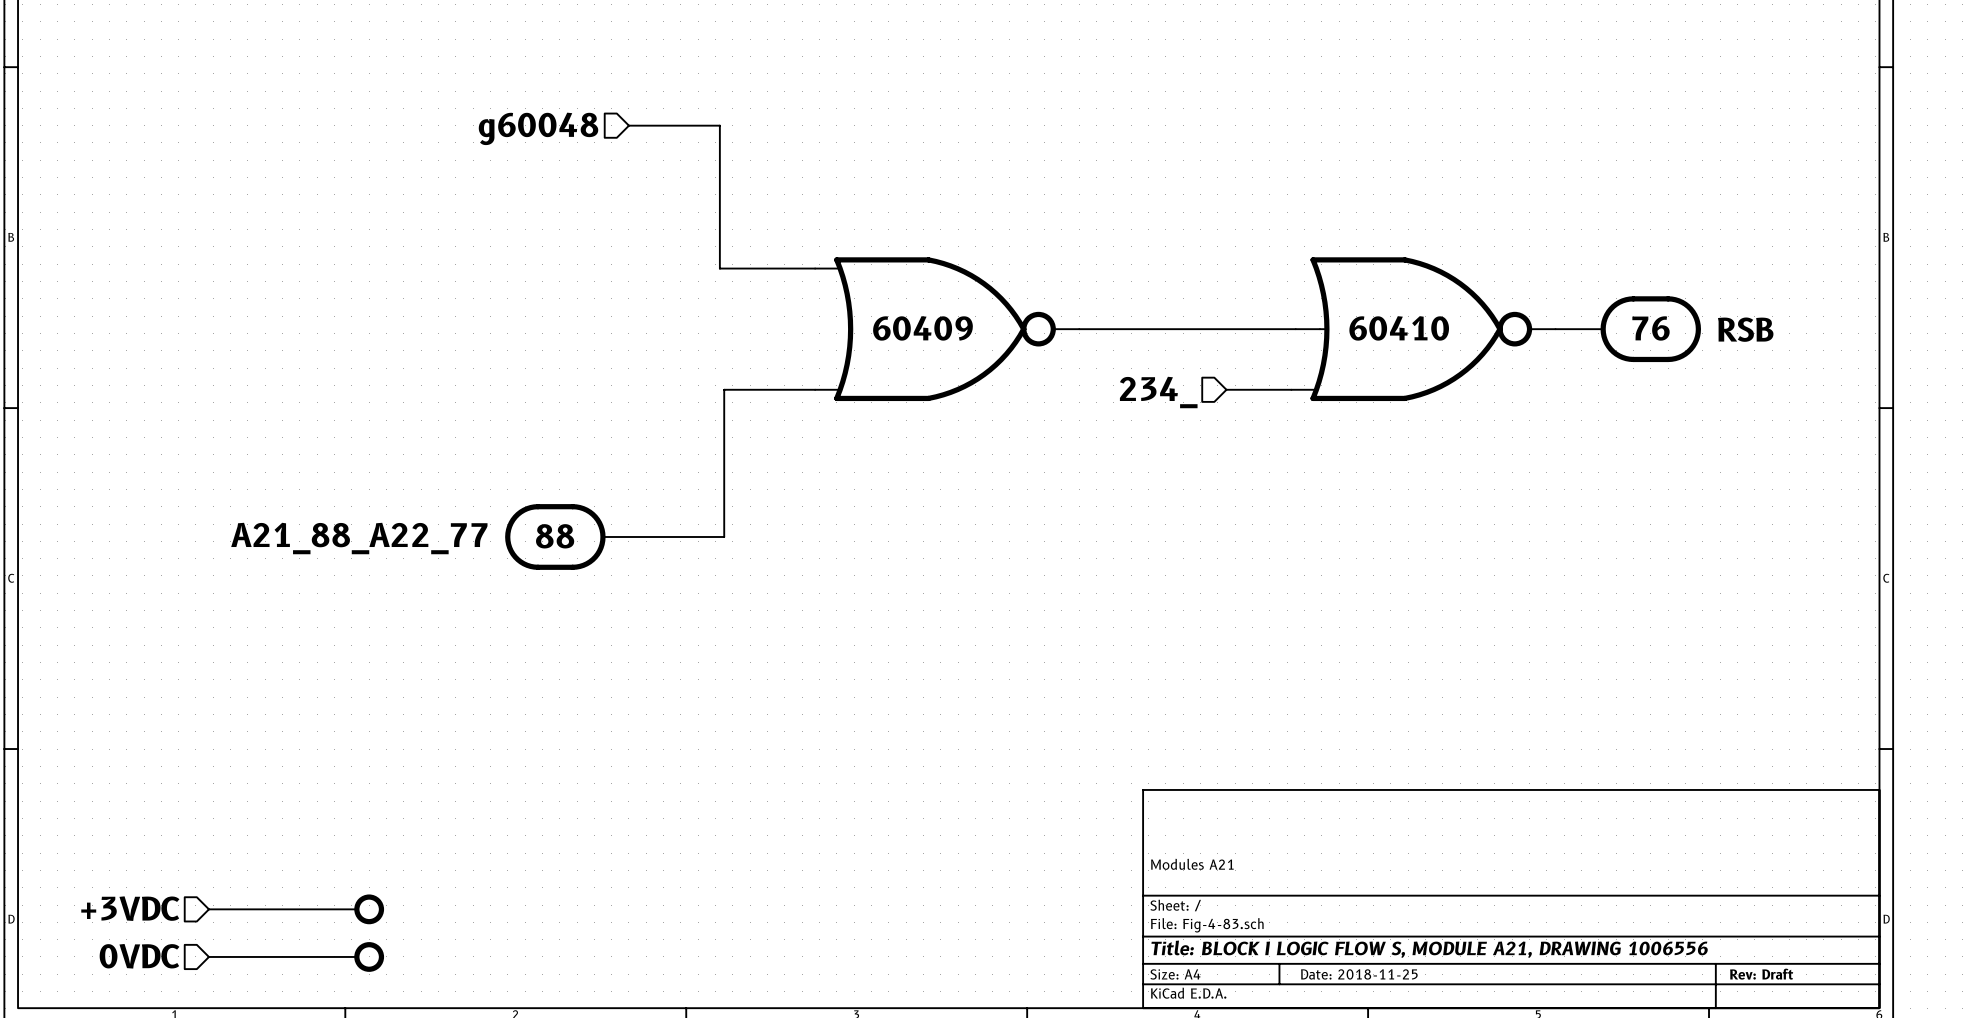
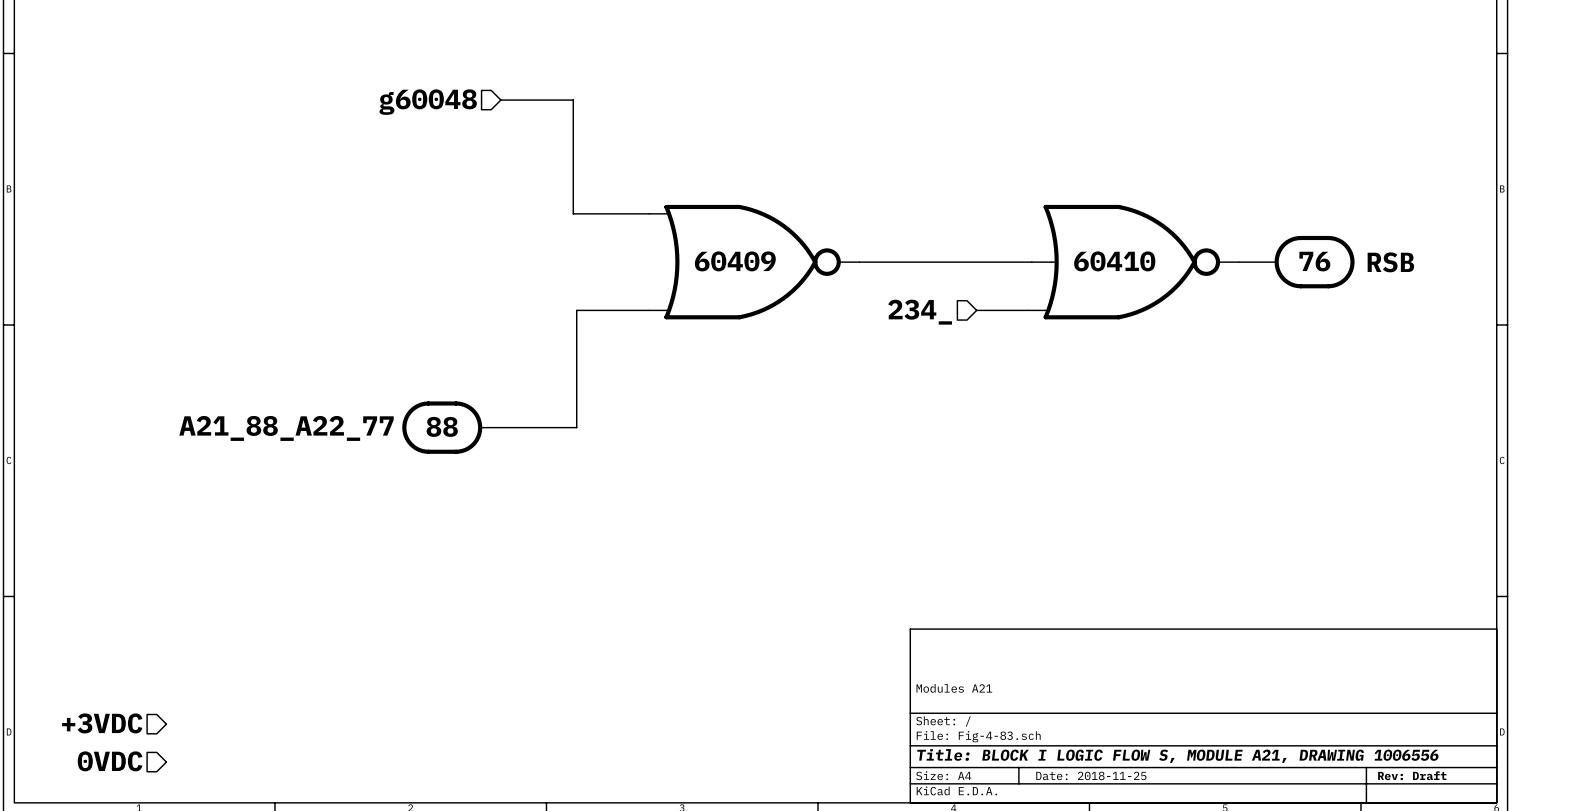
wire: (208, 909) (356, 909) -> none
part: (369, 909) -> none
wire: (208, 956) (356, 956) -> none
part: (369, 956) -> none

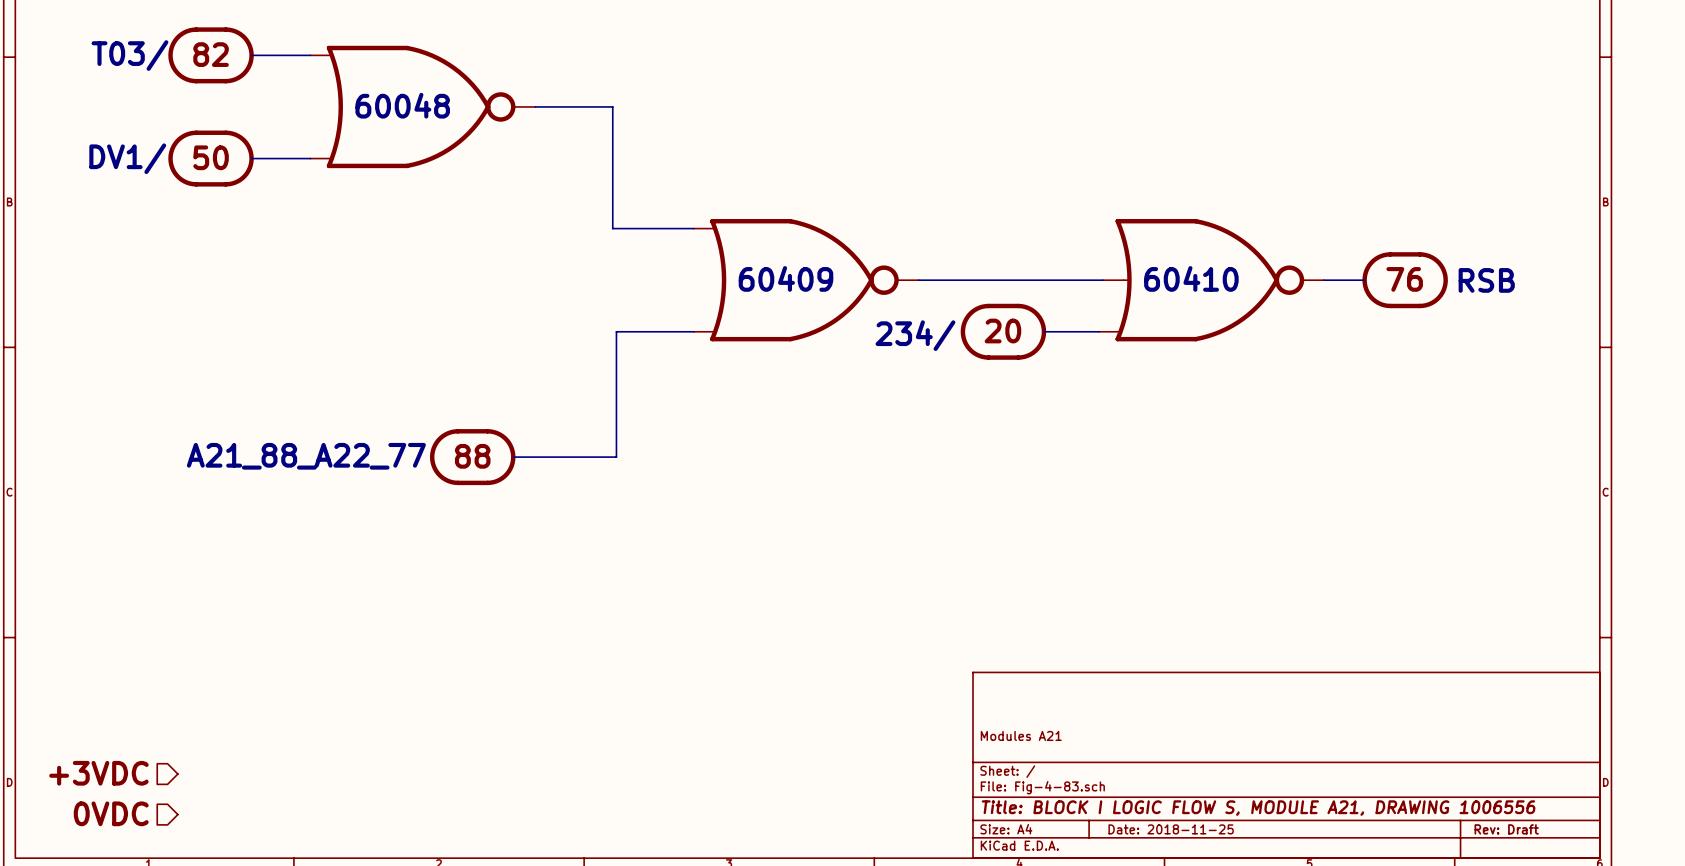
part: none -> (211, 55)
wire: none -> (251, 55) (310, 55)
part: none -> (422, 106)
hierarchical label: g60048 (428, 102) -> none
part: none -> (211, 158)
wire: none -> (251, 158) (310, 158)
part: none -> (1003, 331)
hierarchical label: 234_ (920, 312) -> none

